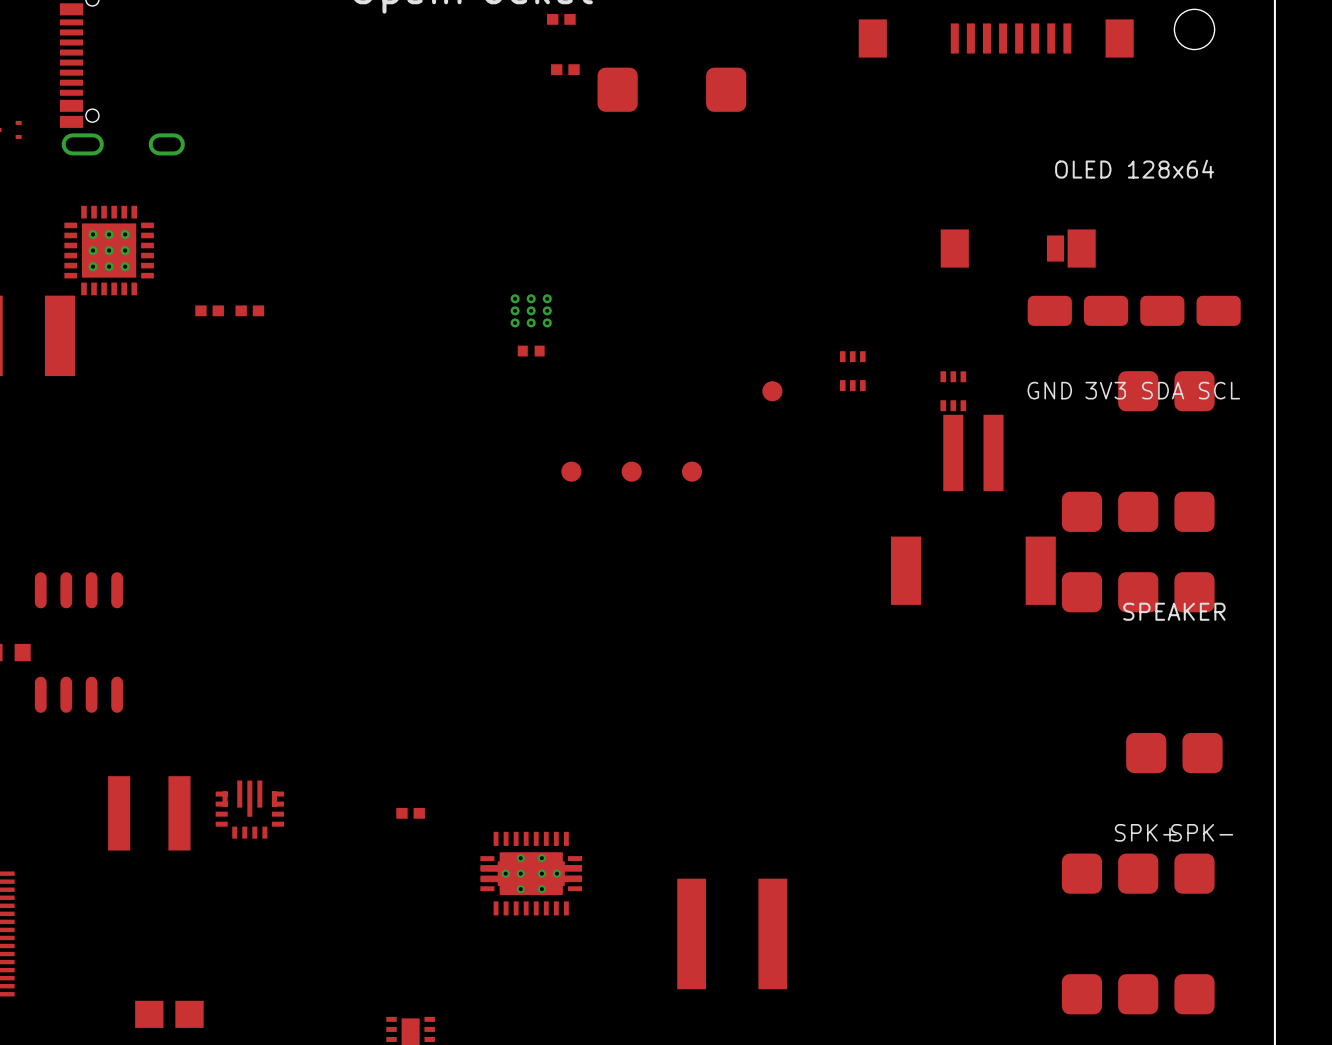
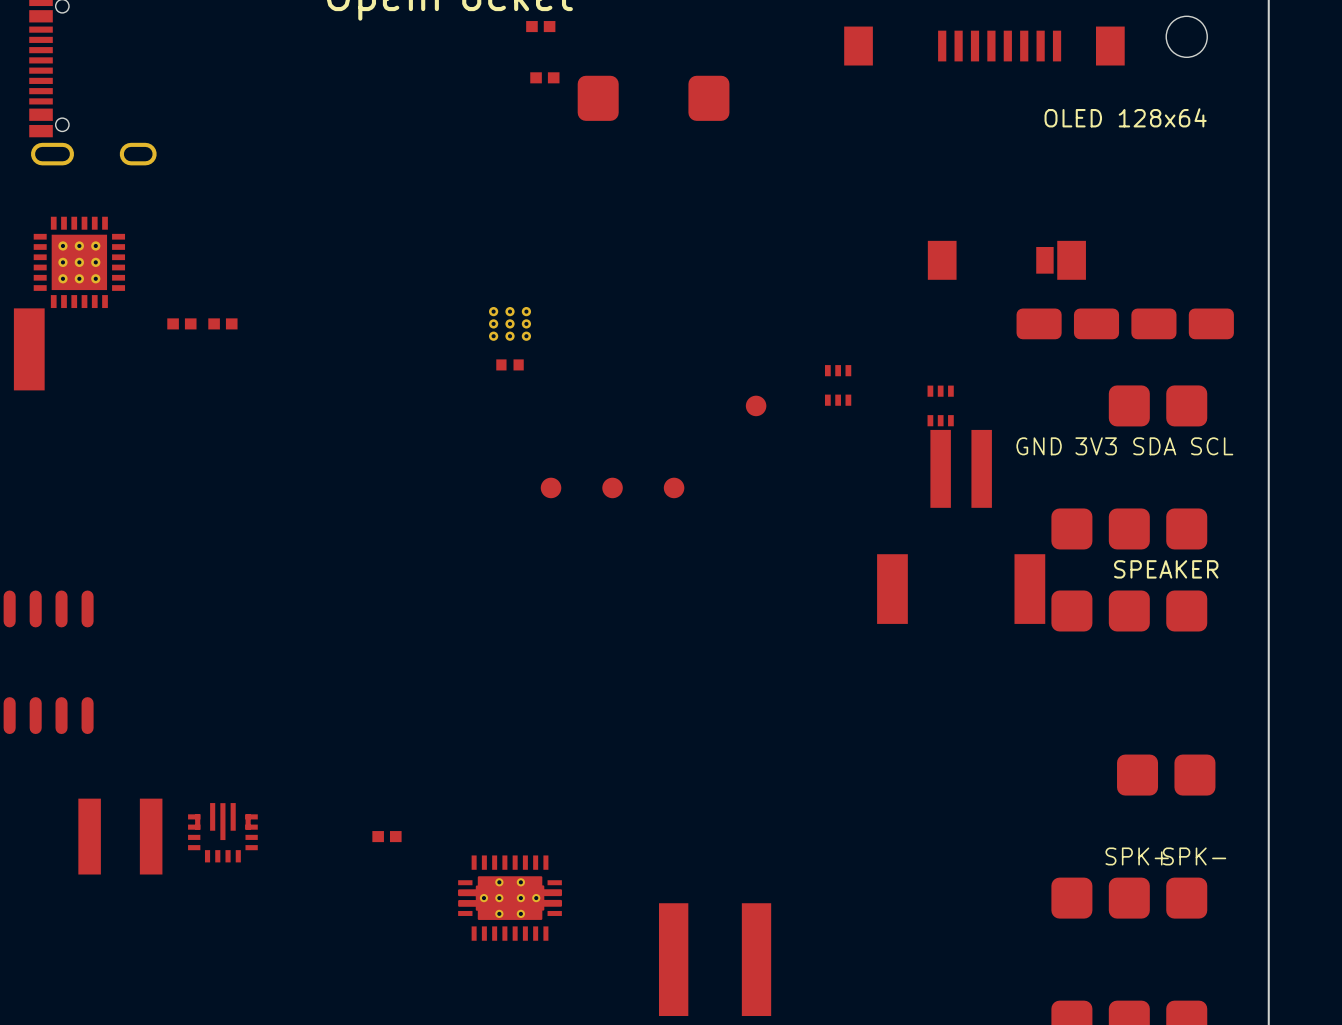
text position: OLED 128x64 (1134, 169) -> OLED 128x64 (1125, 117)
text position: GND (1049, 390) -> GND (1039, 446)
text position: 3V3 (1105, 390) -> 3V3 (1096, 446)
text position: SDA (1163, 390) -> SDA (1154, 446)
text position: SCL (1219, 390) -> SCL (1212, 446)
text position: SPEAKER (1174, 611) -> SPEAKER (1166, 569)

